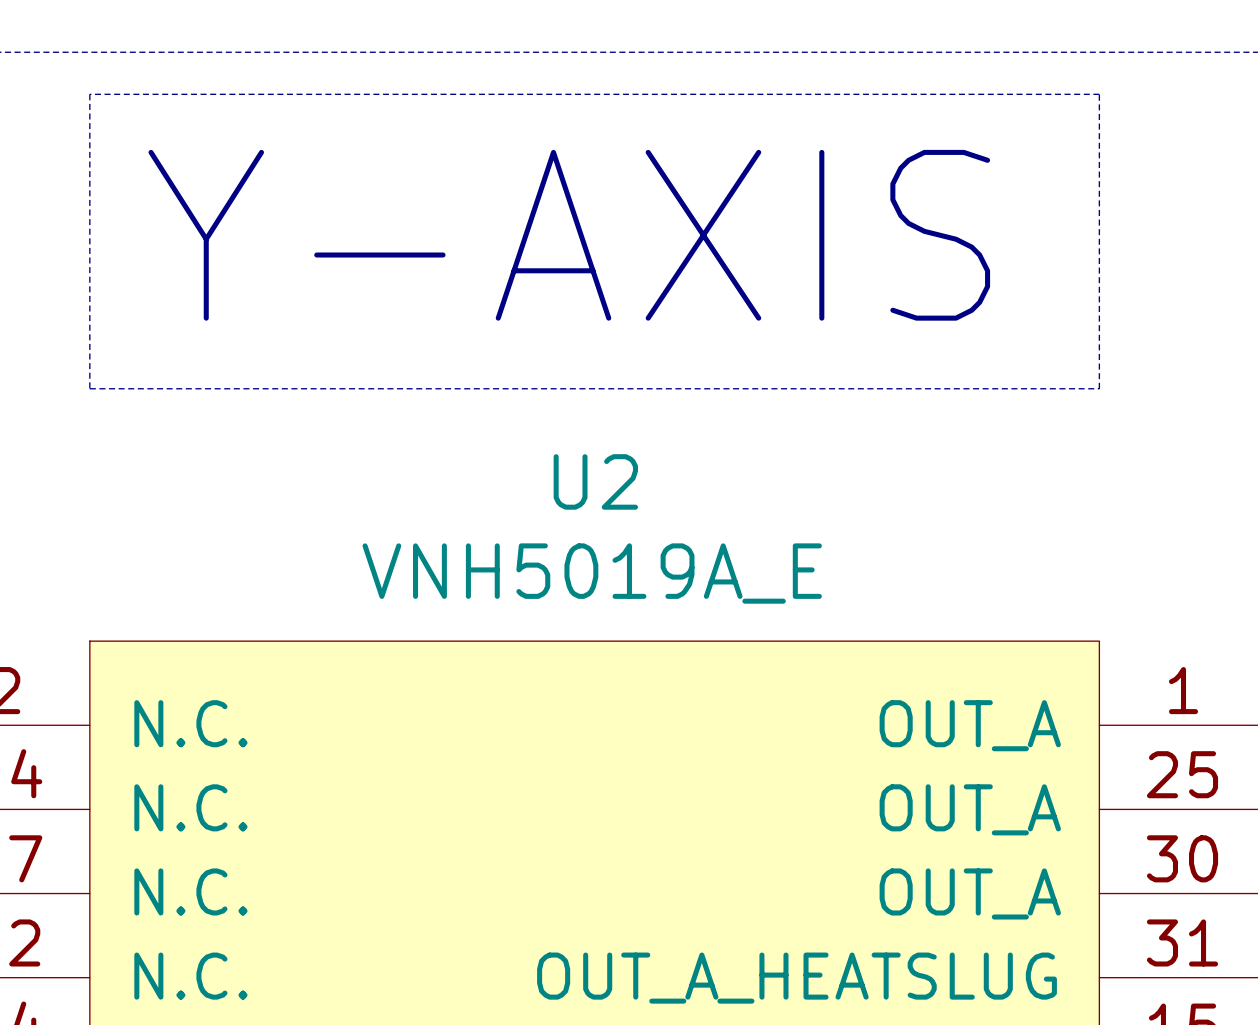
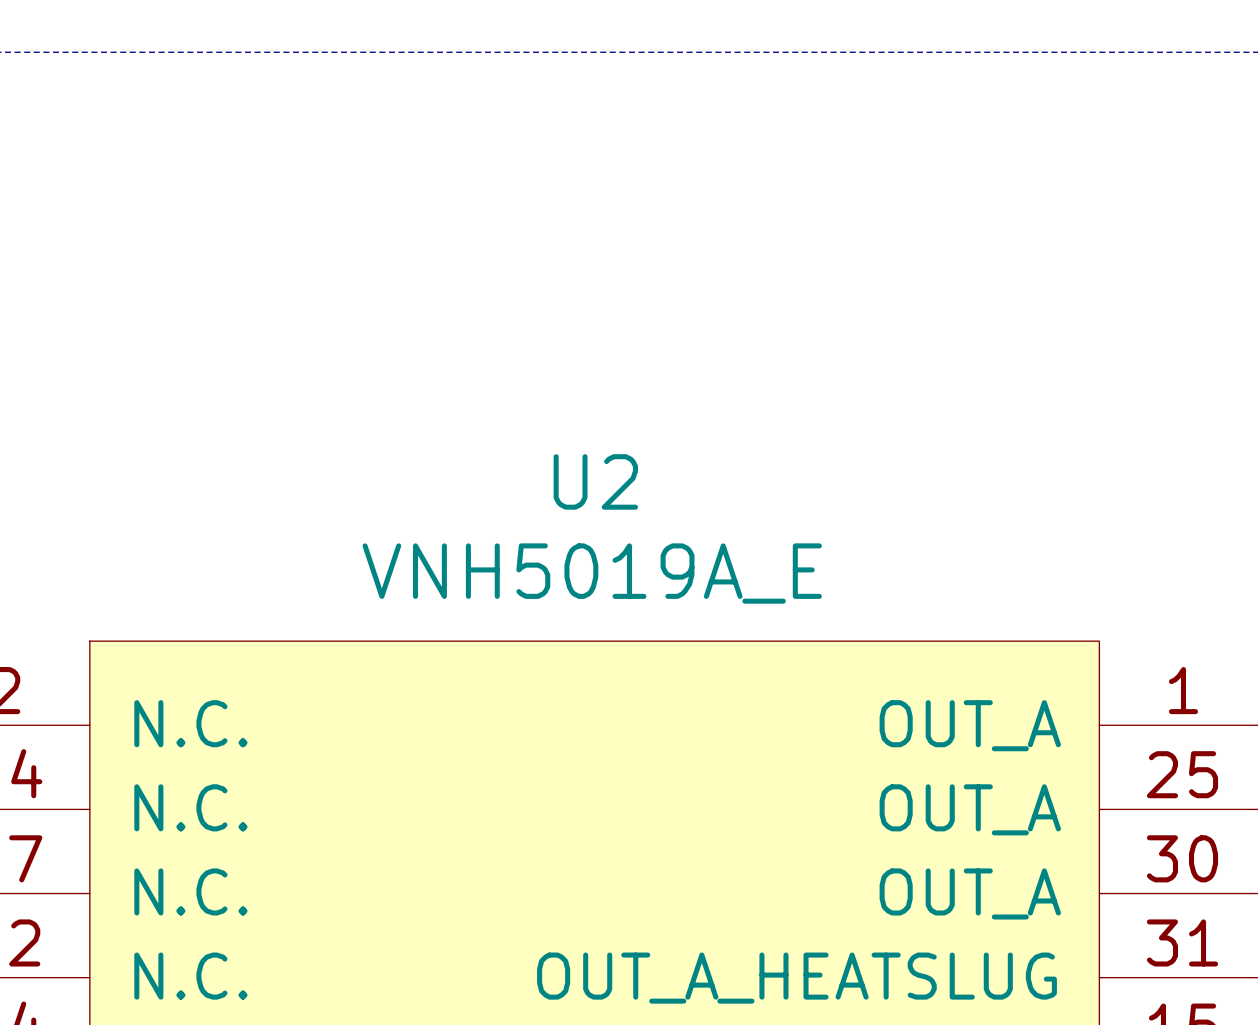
line: (89, 94) (1099, 94) (1099, 388) (89, 388) (89, 94) -> none
text: Y-AXIS (569, 235) -> none

